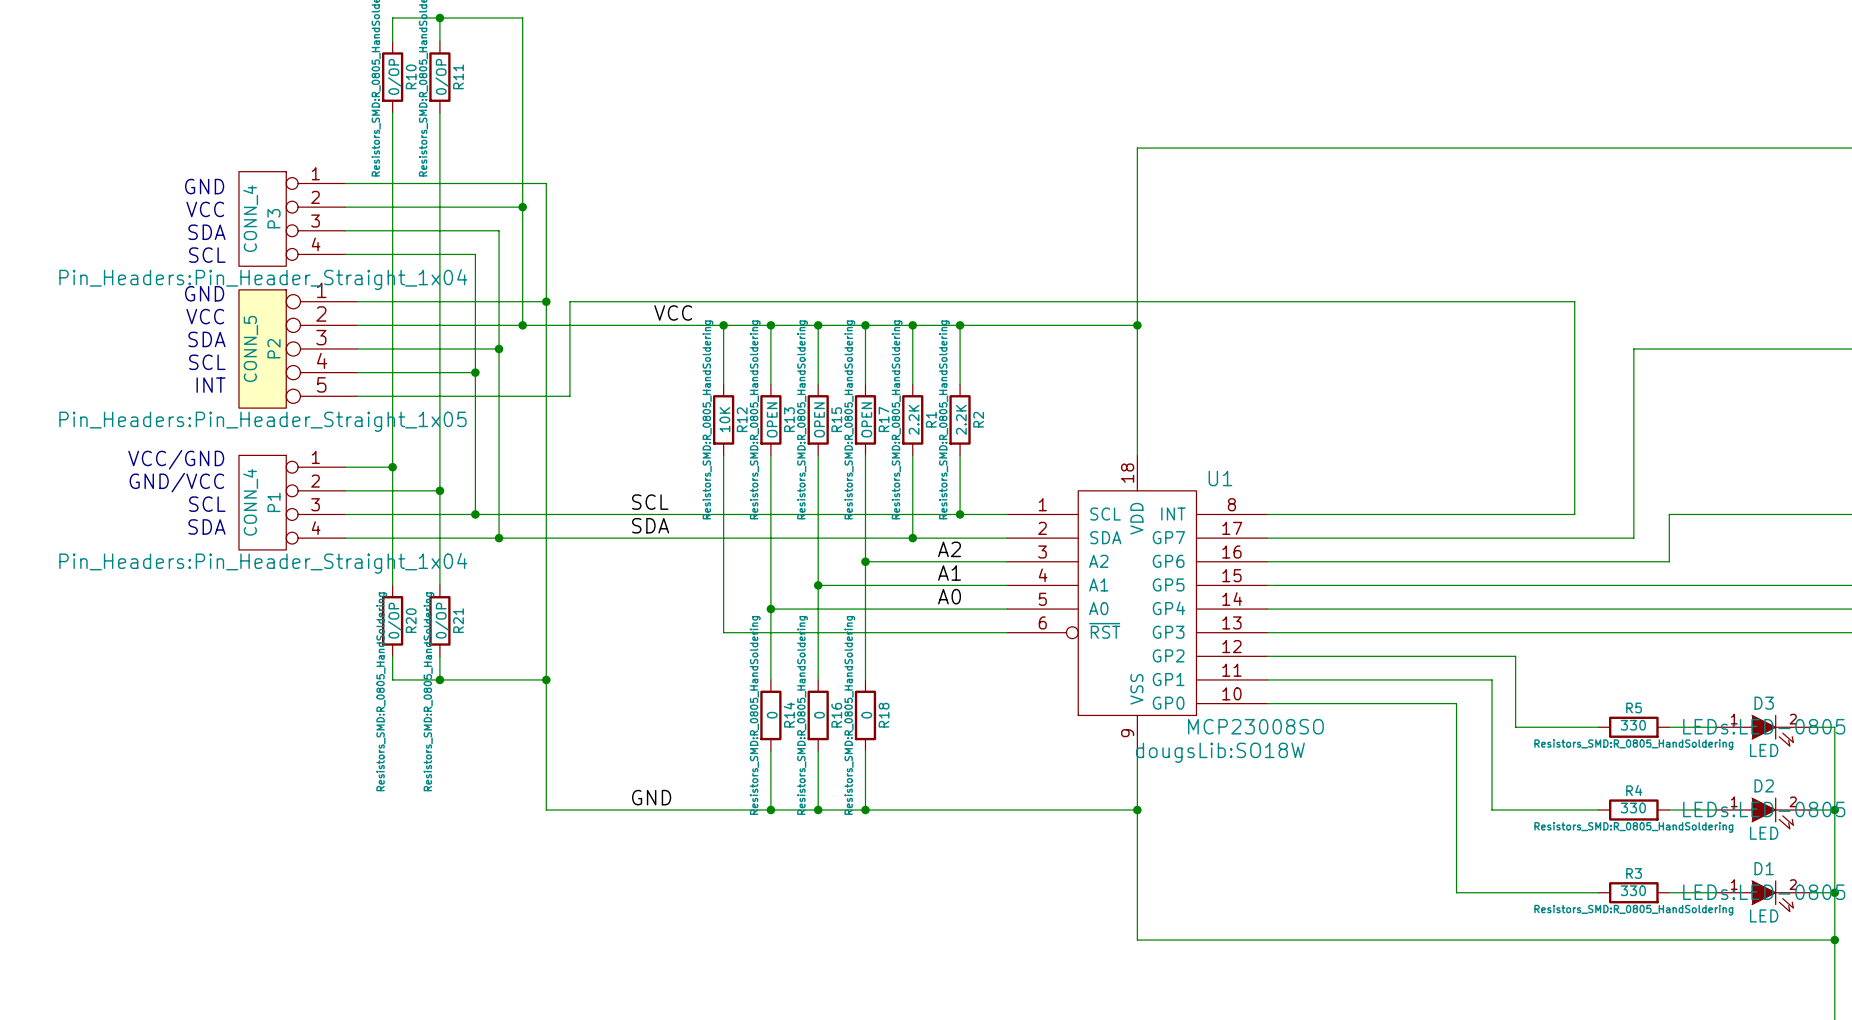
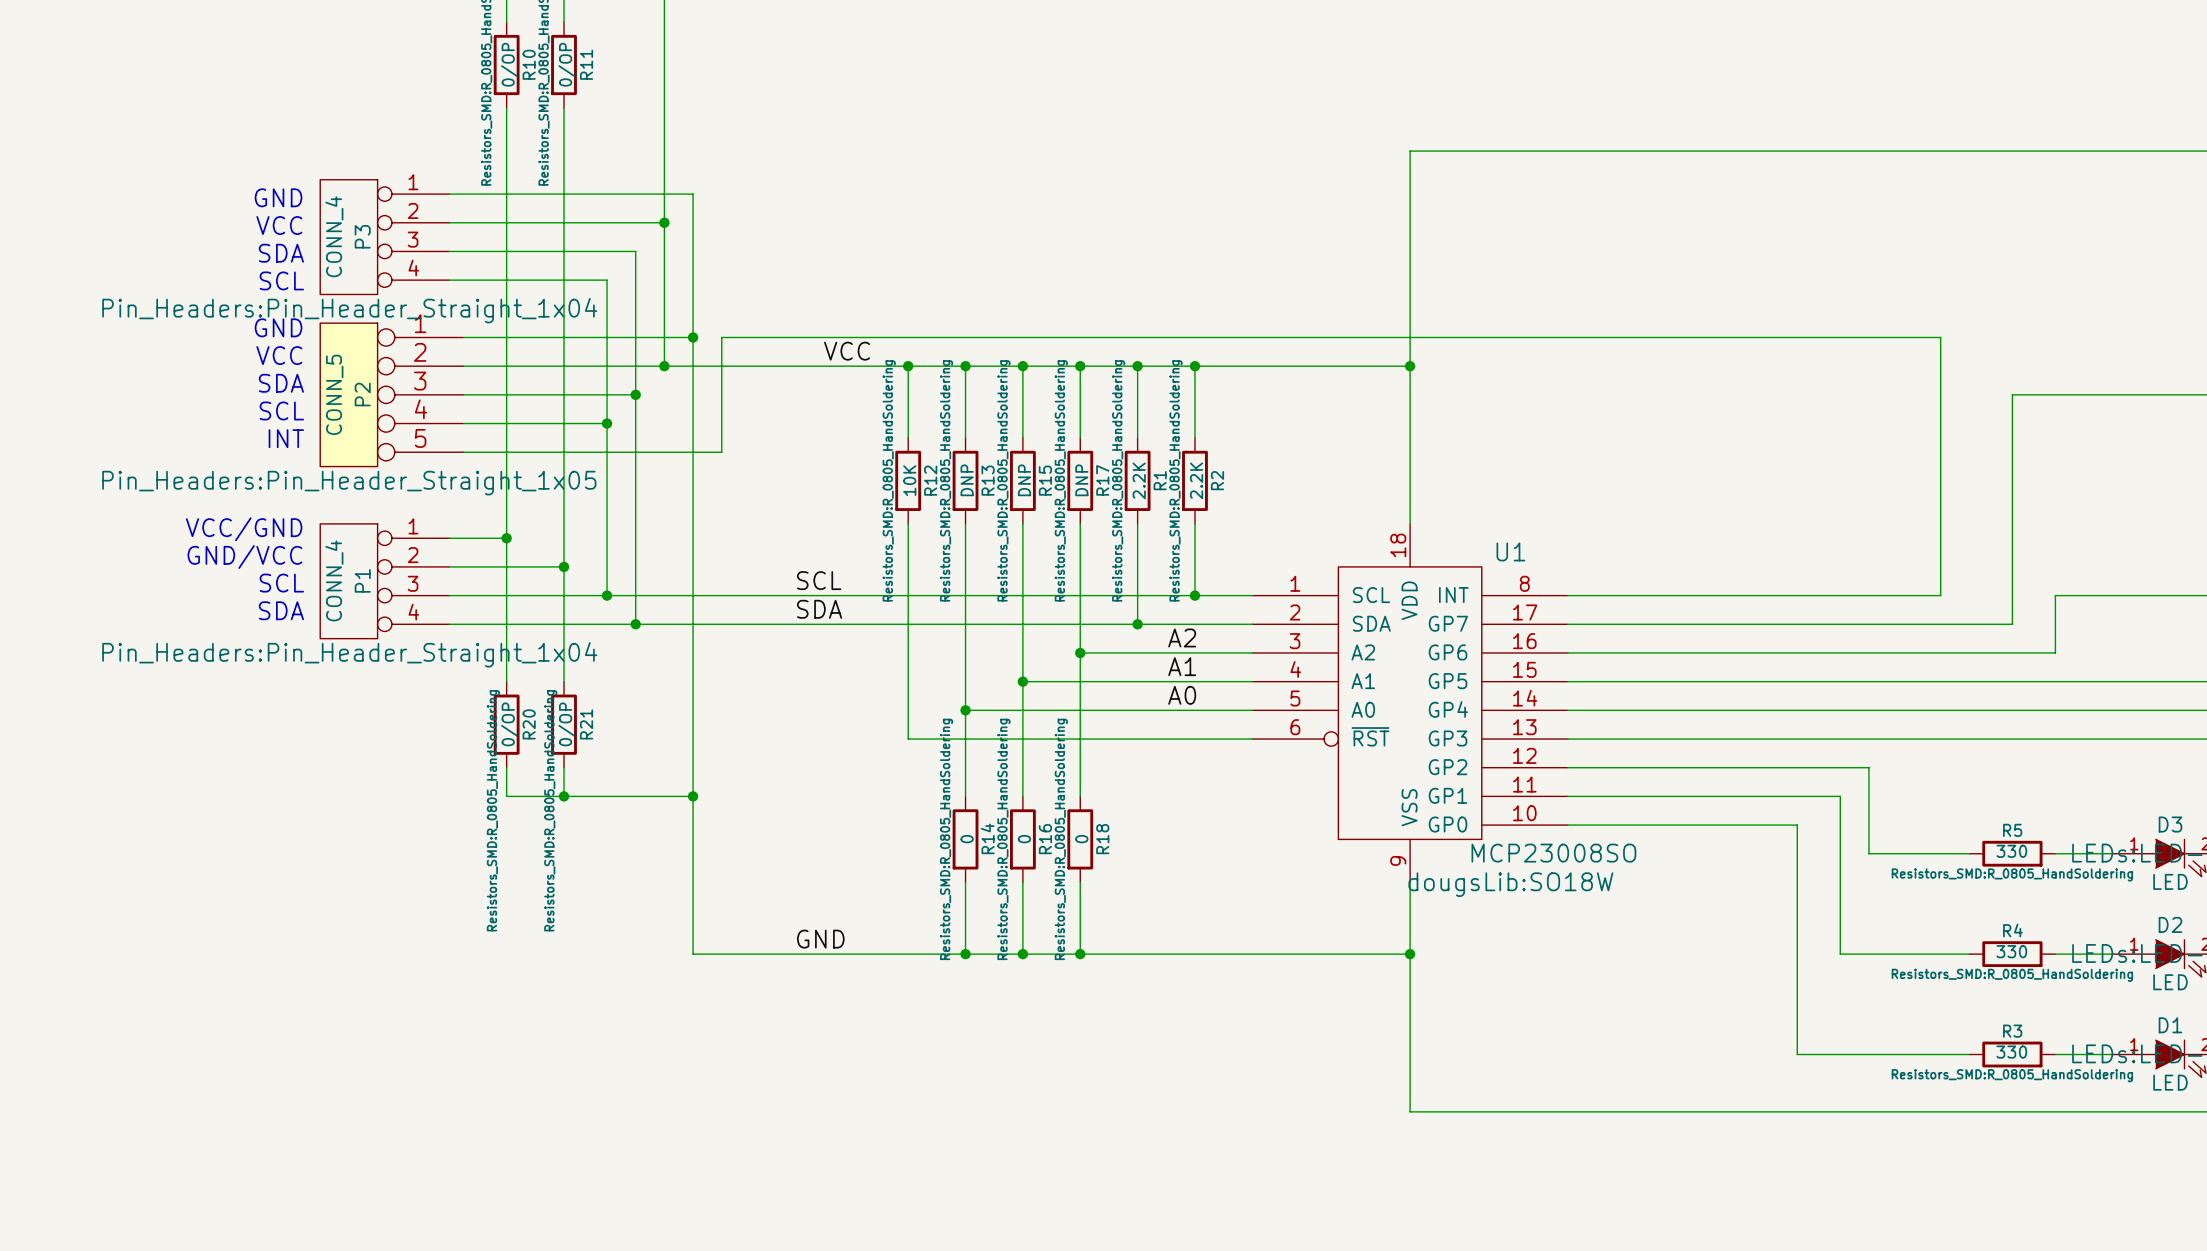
R13 value: OPEN (772, 419) -> DNP (967, 480)
R15 value: OPEN (819, 419) -> DNP (1024, 480)
R17 value: OPEN (866, 419) -> DNP (1081, 480)

